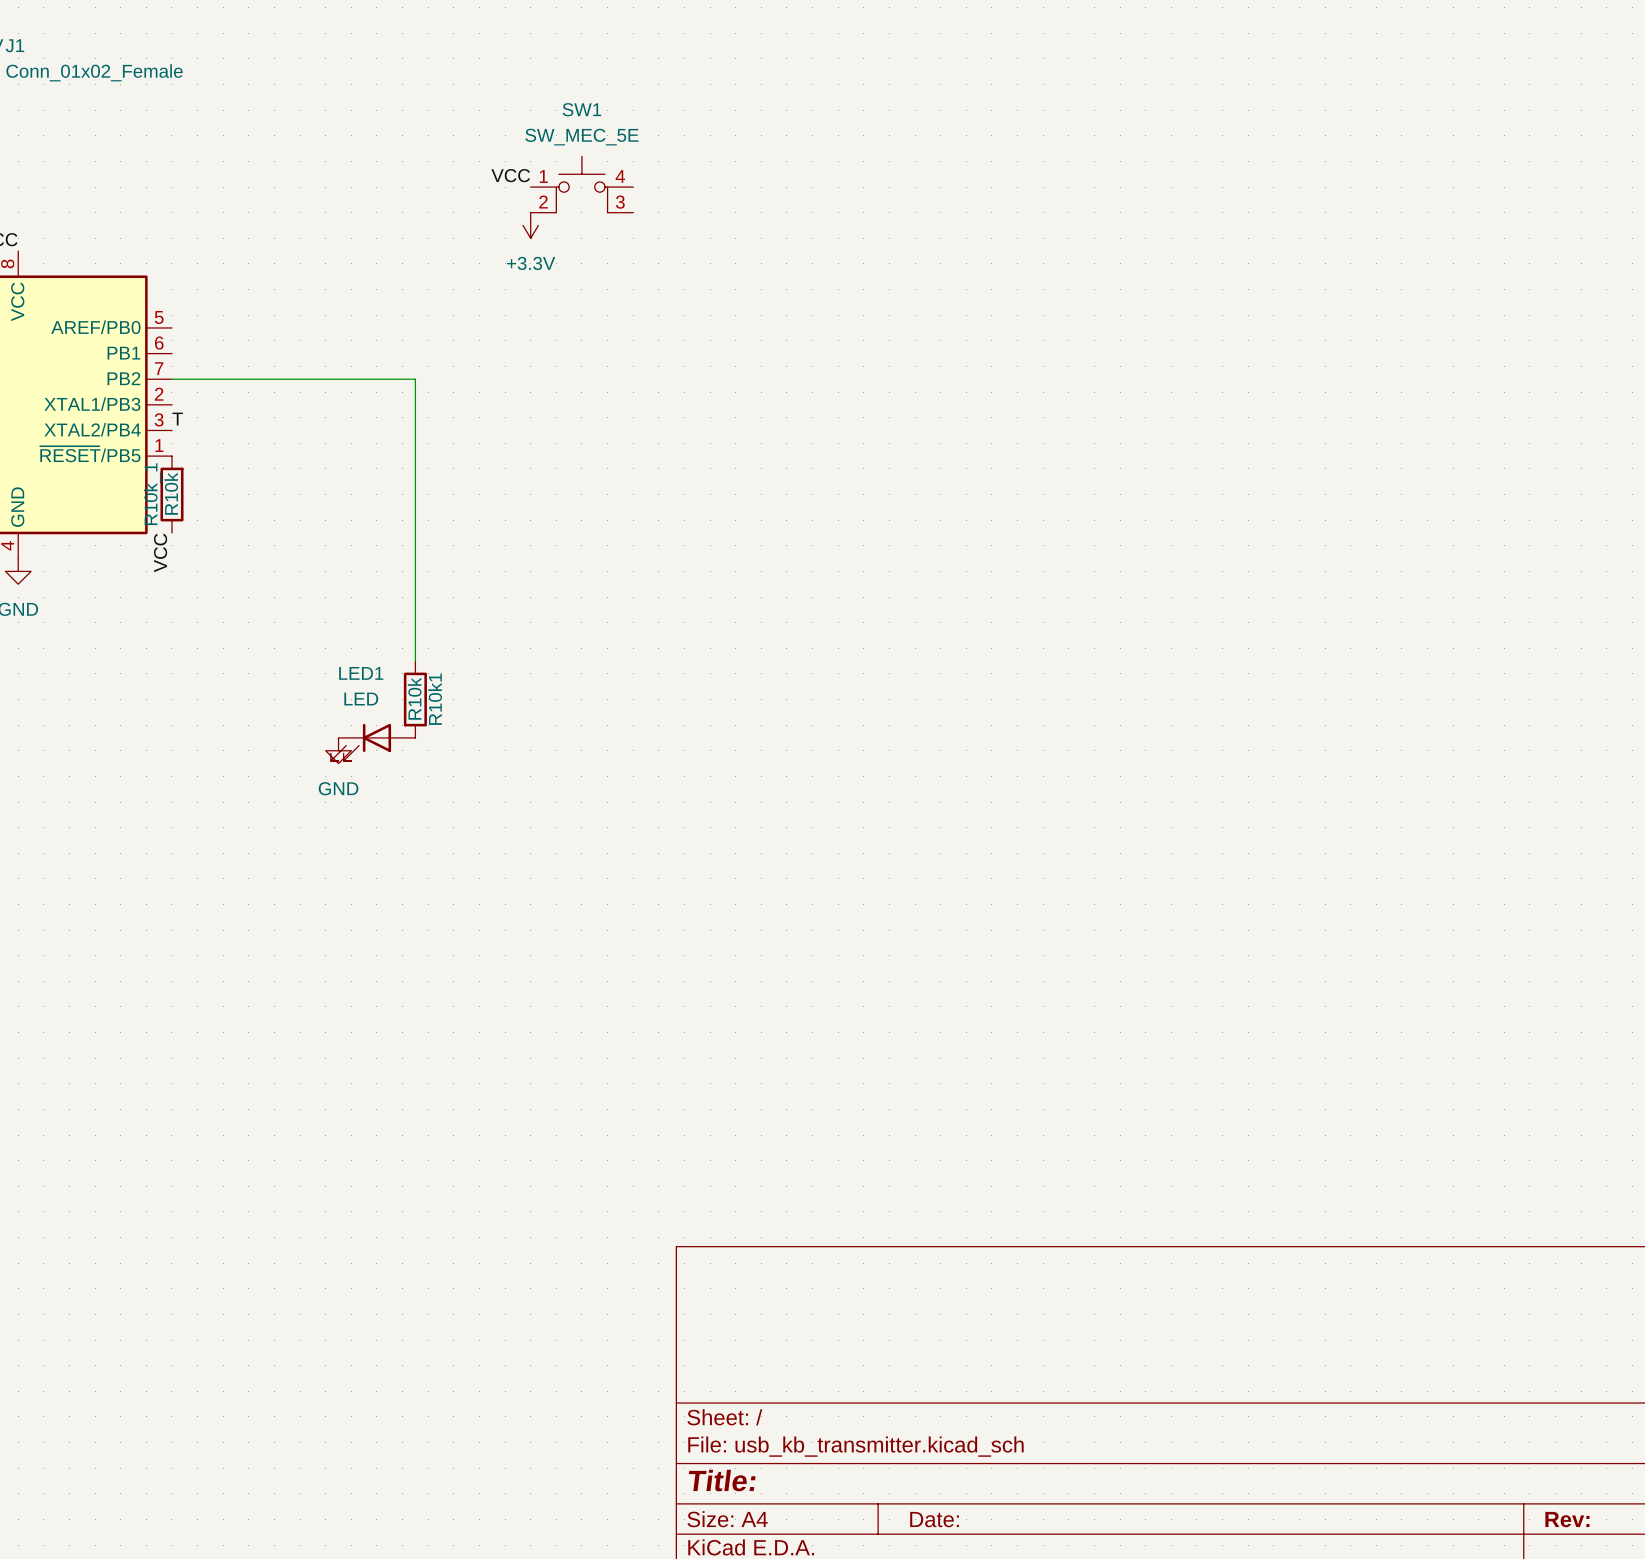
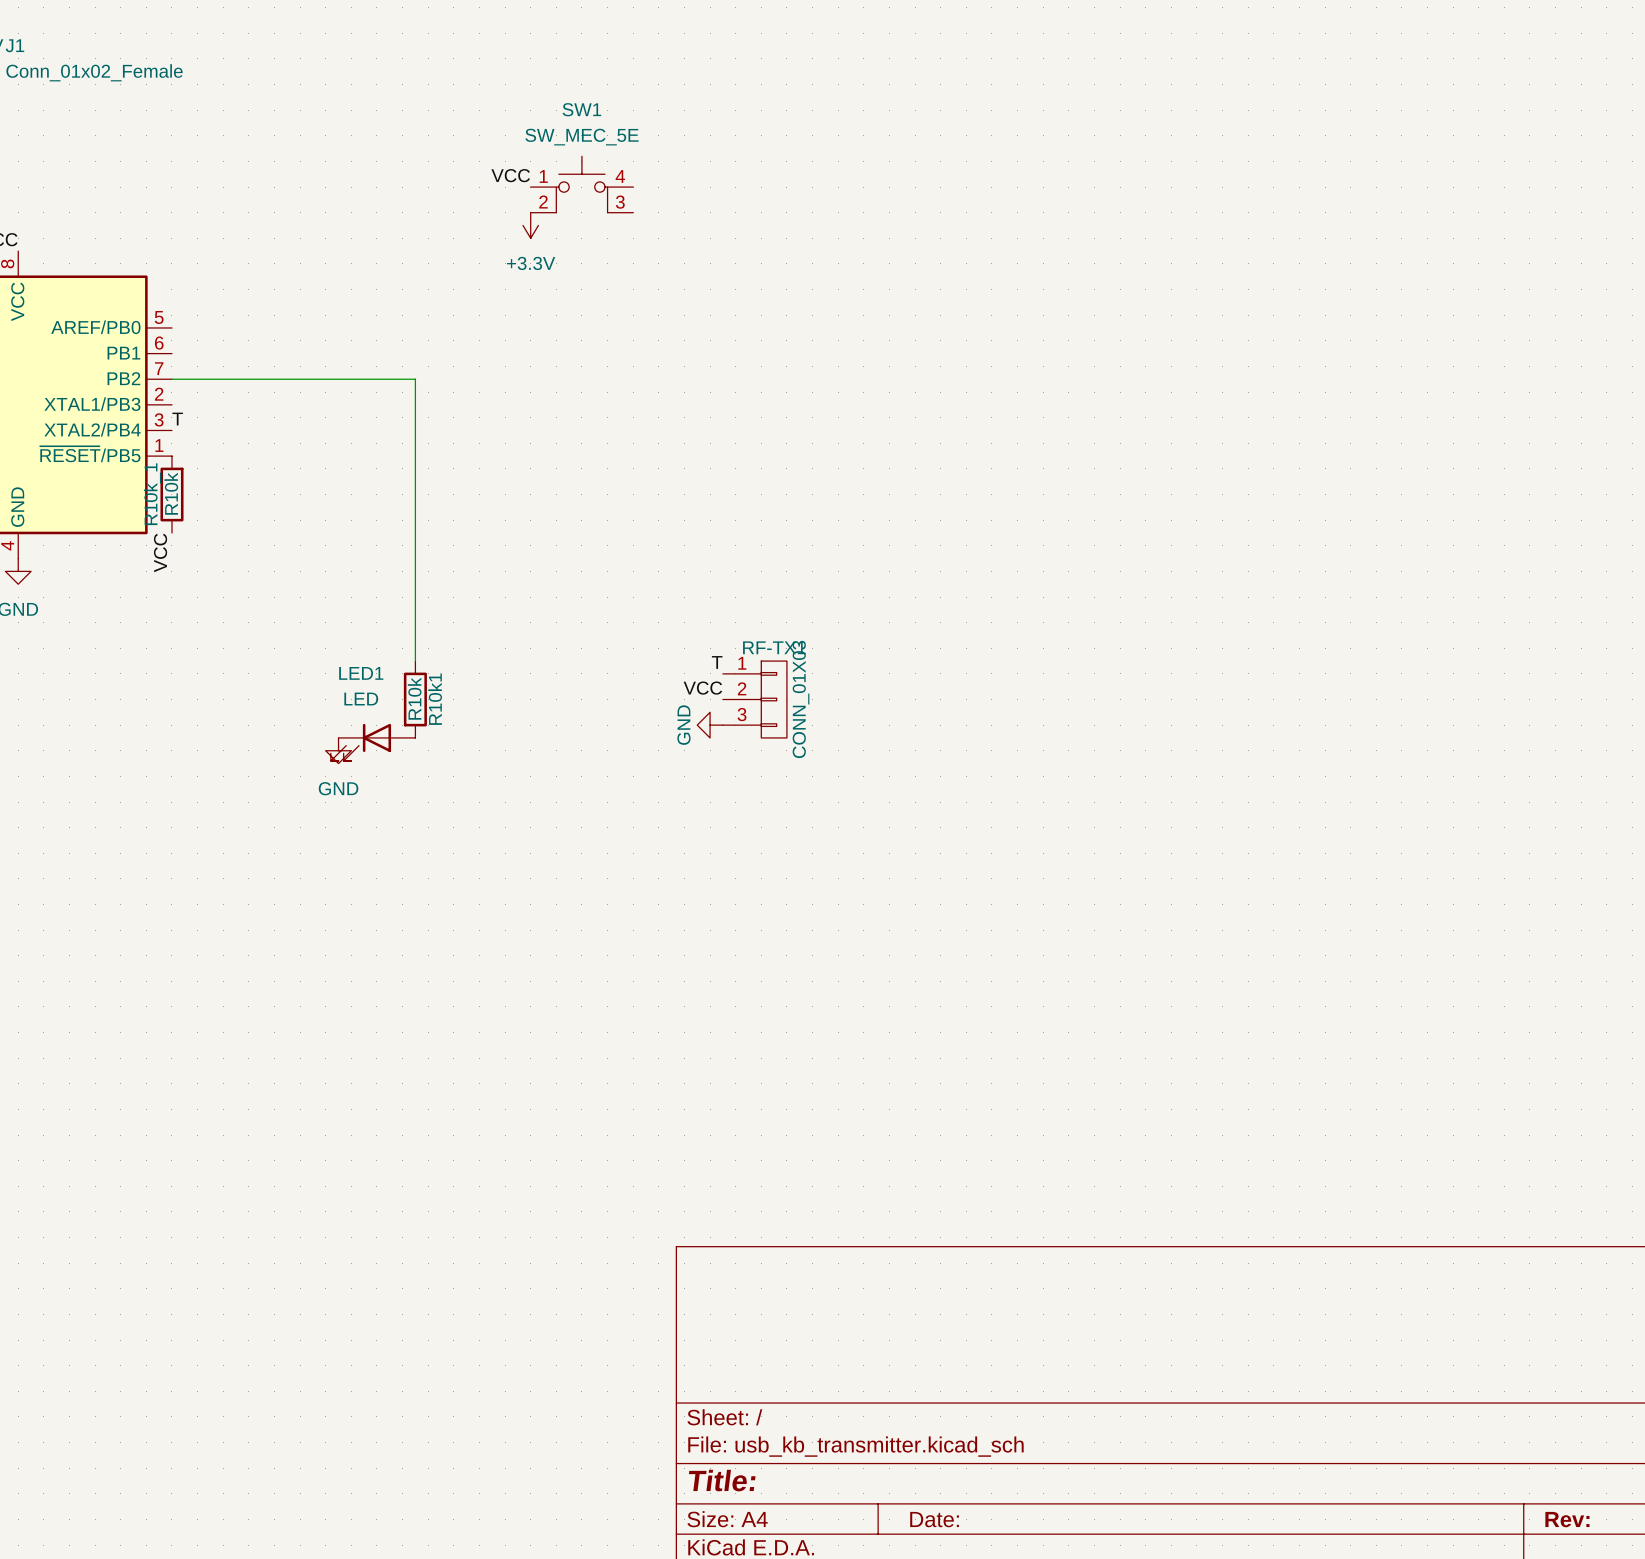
label: none -> T (717, 662)
label: none -> VCC (702, 688)
RF-TX1: none -> CONN_01X03 (754, 699)
power symbol: none -> GND (710, 725)

